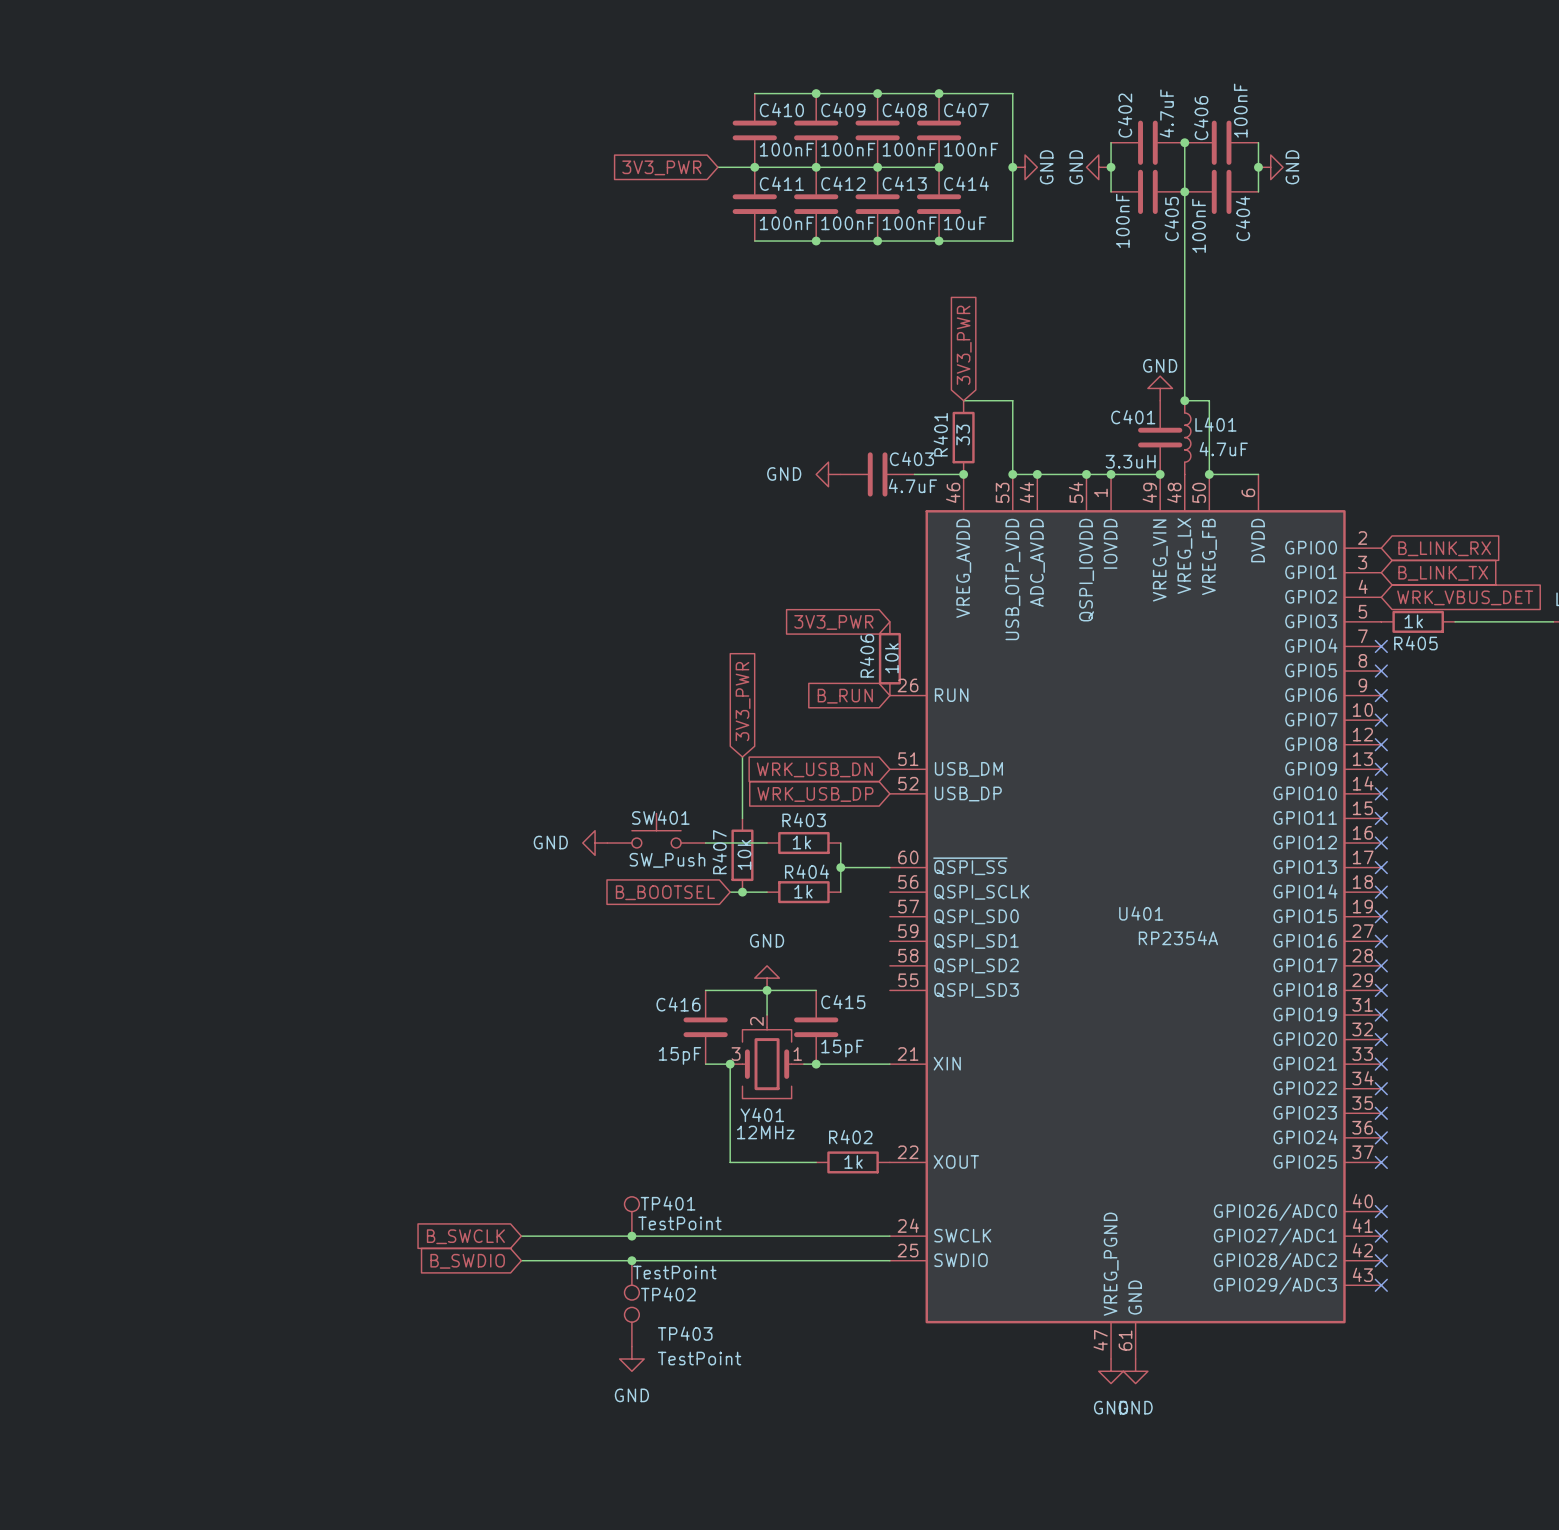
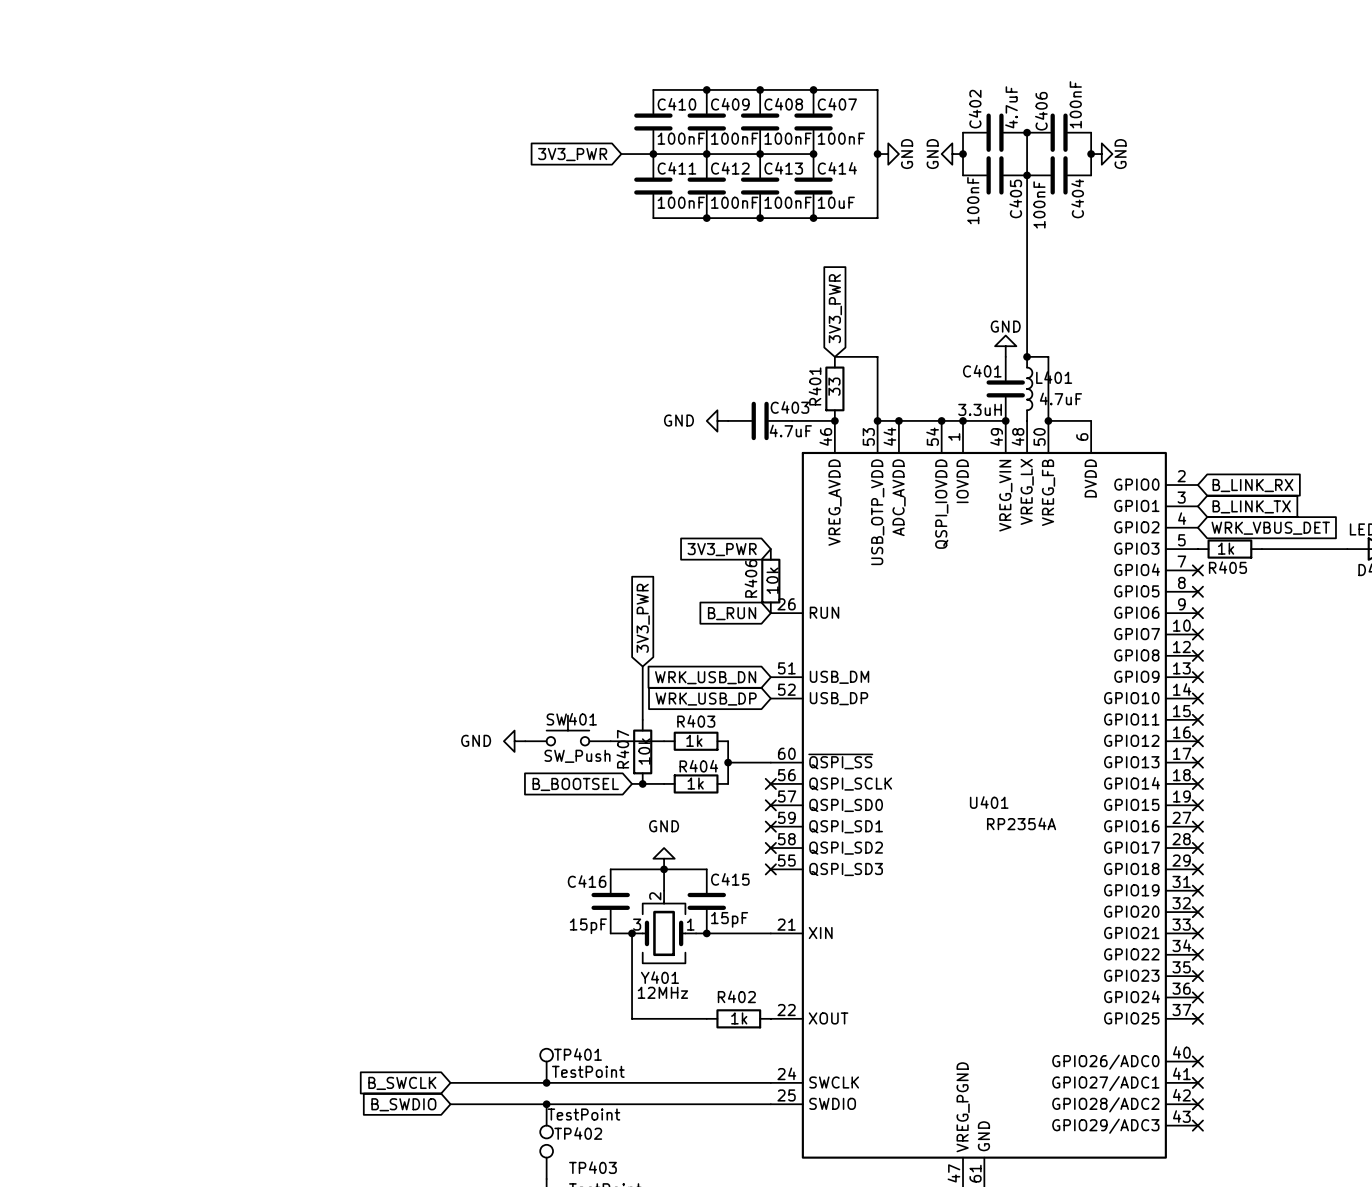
no-connect mark: none -> (770, 783)
no-connect mark: none -> (770, 805)
no-connect mark: none -> (770, 826)
no-connect mark: none -> (770, 848)
no-connect mark: none -> (770, 869)

